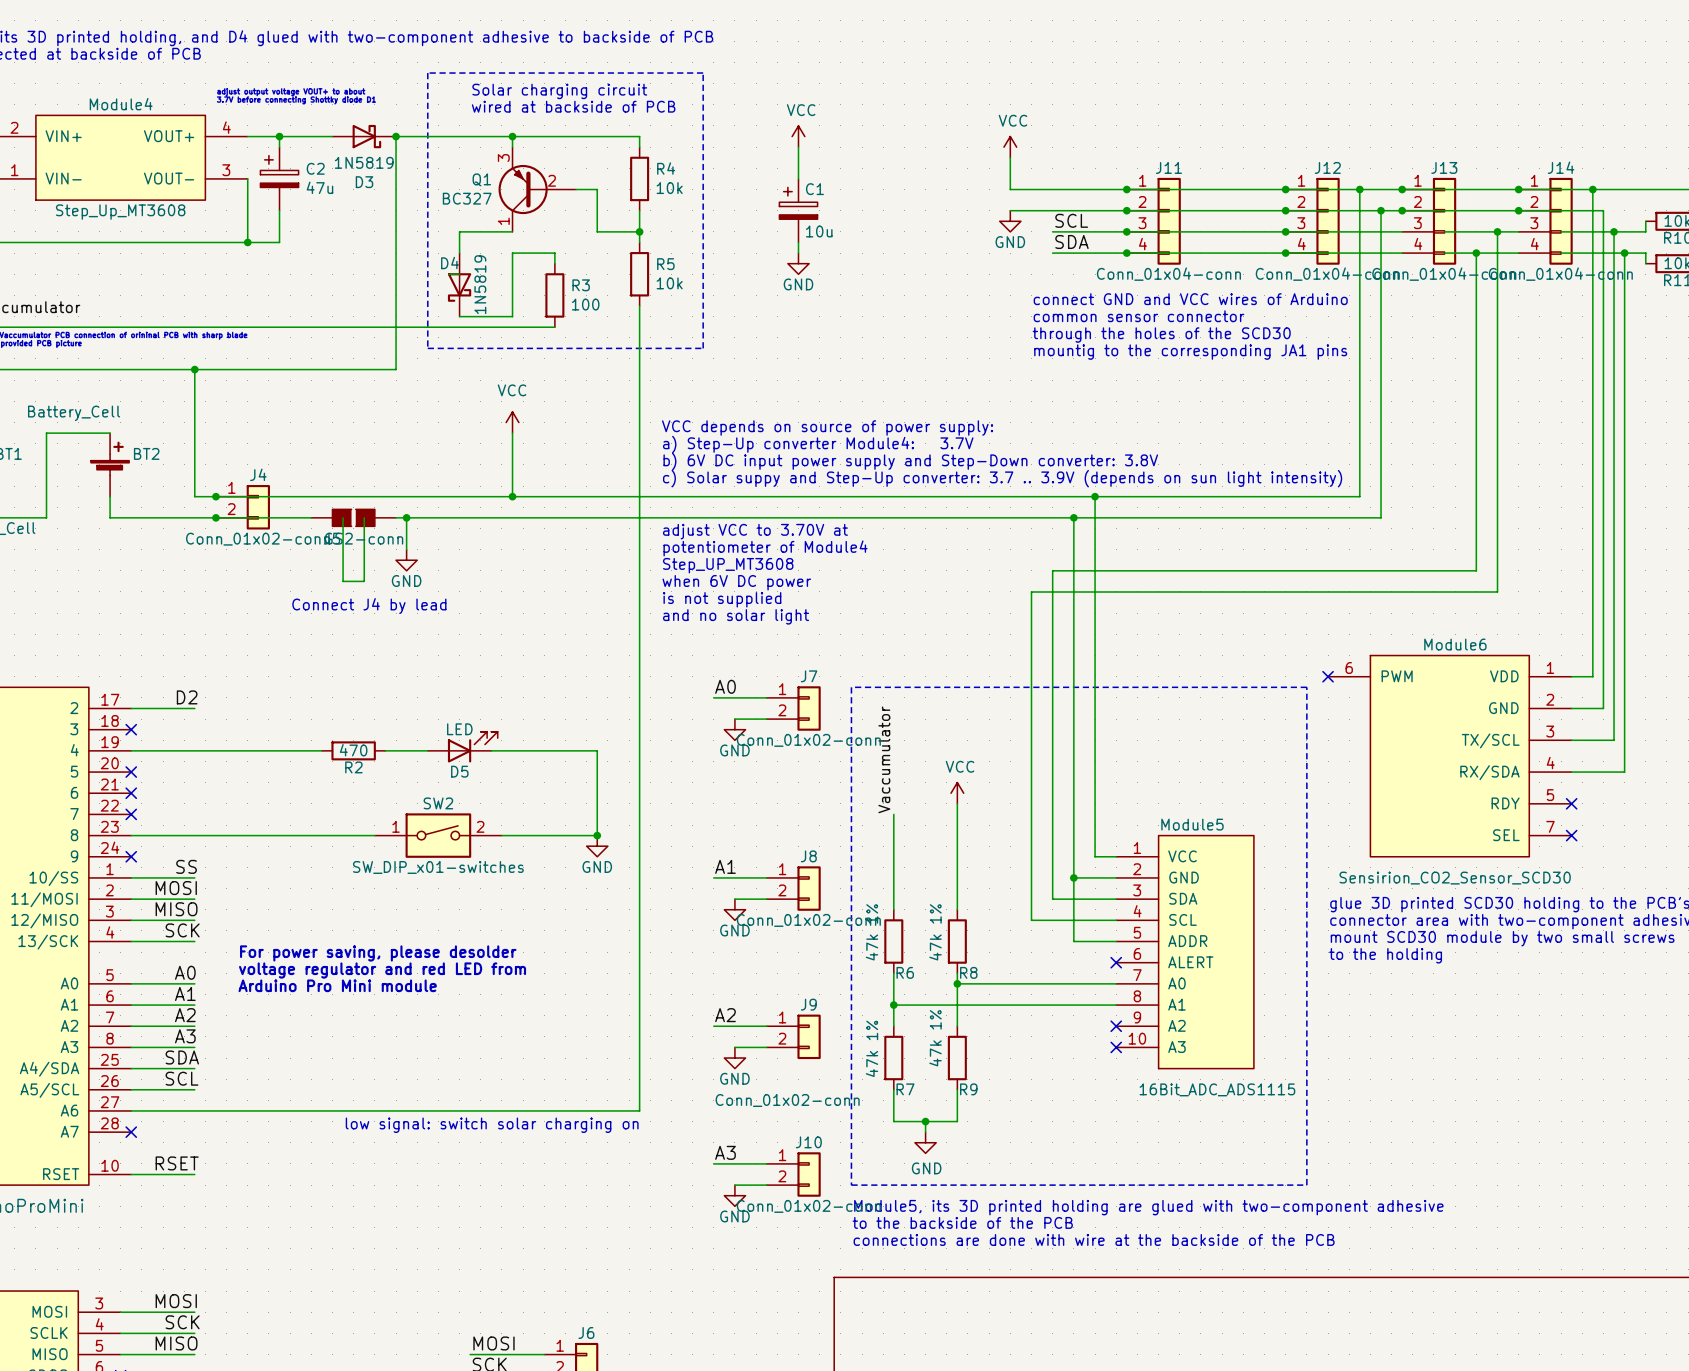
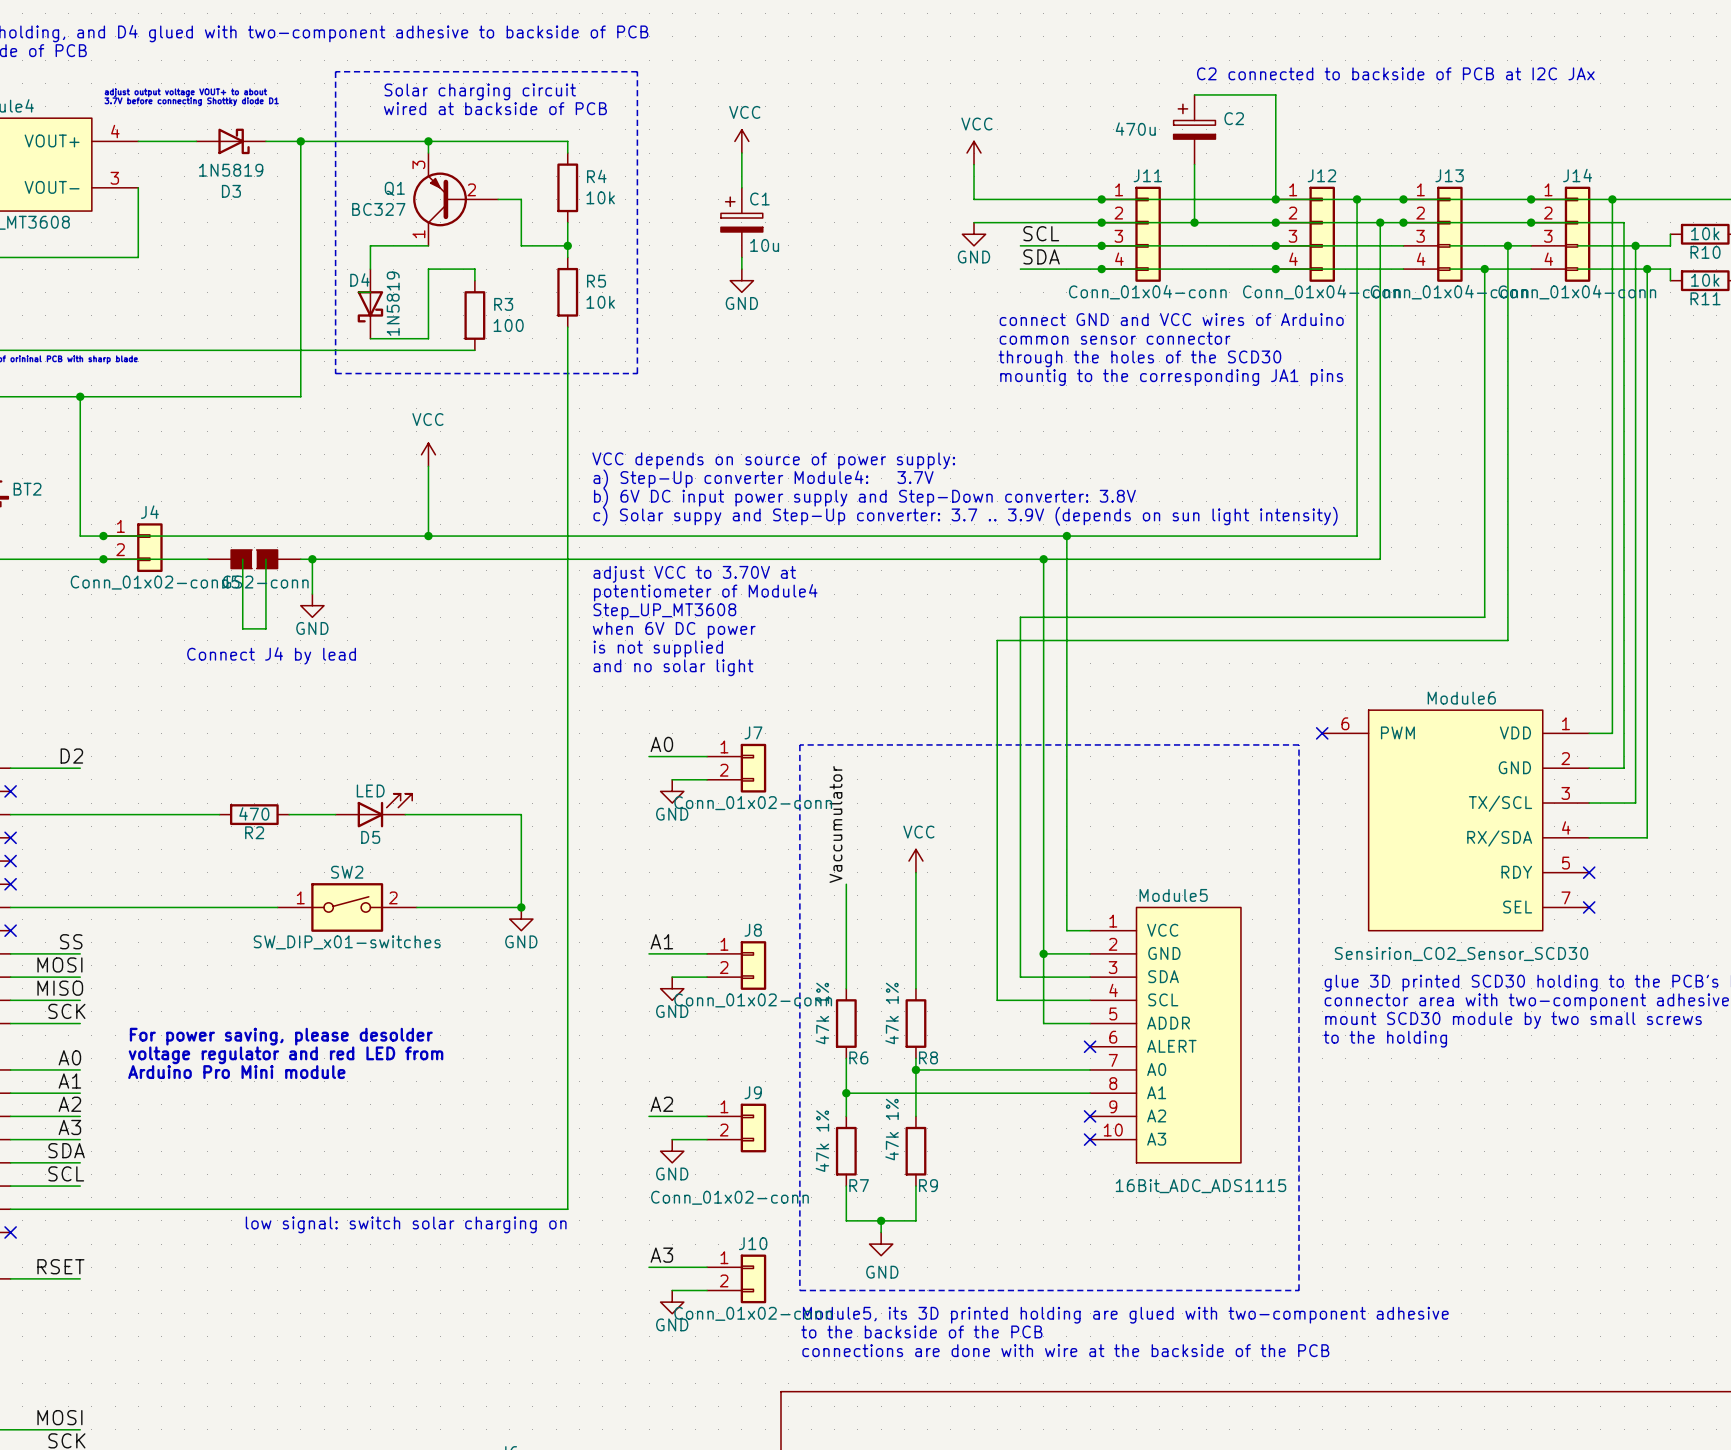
text: none -> C2 connected to backside of PCB at I2C JAx (1395, 73)
wire: none -> (1194, 94) (1275, 94) (1275, 199)
wire: (279, 136) (279, 147) -> none
junction: (279, 136) -> none
D3 position: (364, 136) -> (231, 141)
wire: none -> (1194, 164) (1194, 222)
C2 position: (279, 178) -> (1194, 129)
C2 value: 47u (319, 187) -> 470u (1135, 129)
wire: (279, 210) (279, 242) (247, 242) -> none
junction: none -> (1194, 222)
junction: (247, 242) -> none

